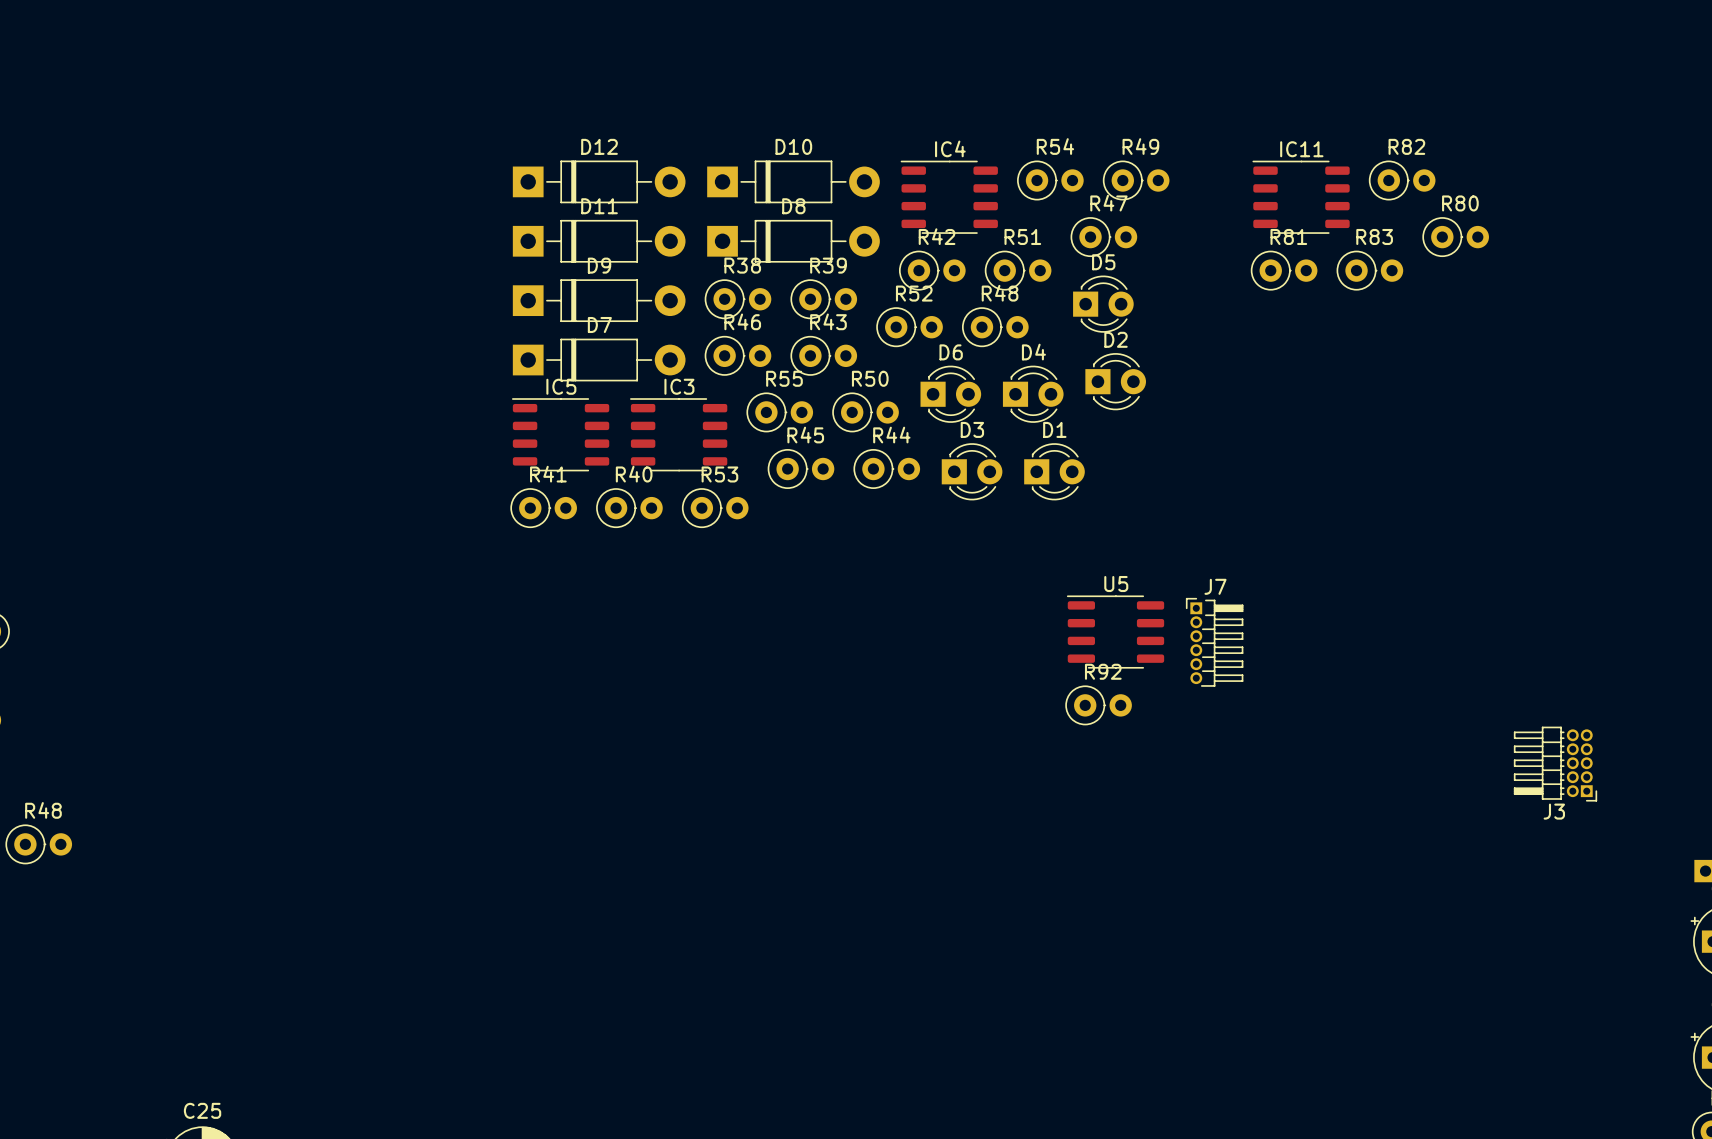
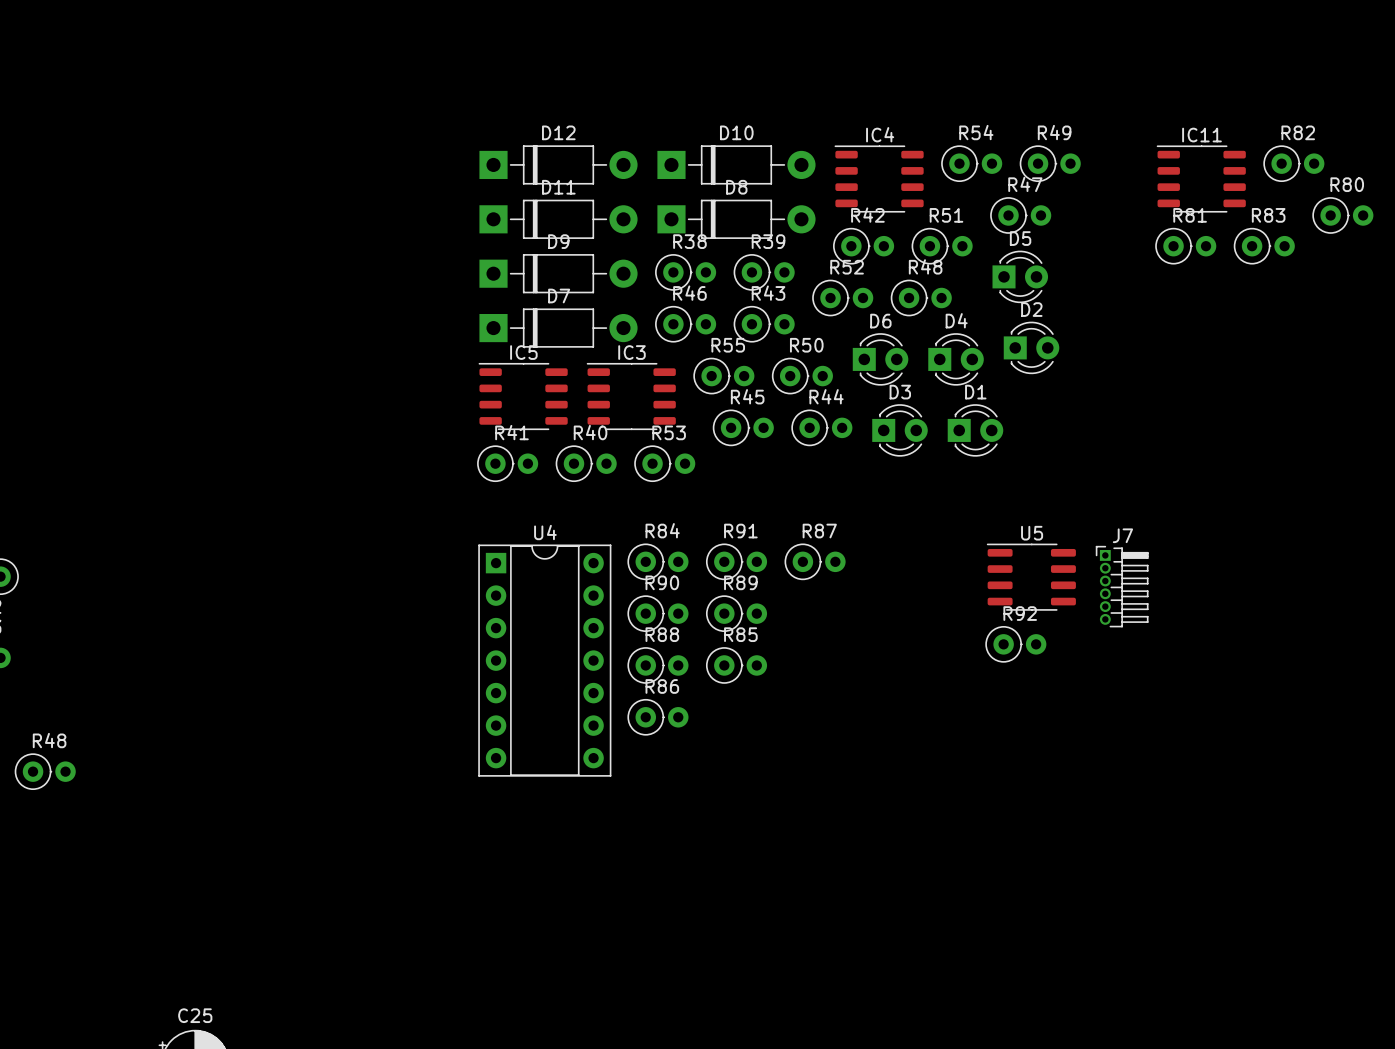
R84: none -> (657, 561)
R91: none -> (736, 561)
R87: none -> (815, 561)
R90: none -> (657, 613)
R89: none -> (736, 613)
U4: none -> (544, 660)
R88: none -> (657, 665)
R85: none -> (736, 665)
R86: none -> (657, 717)

